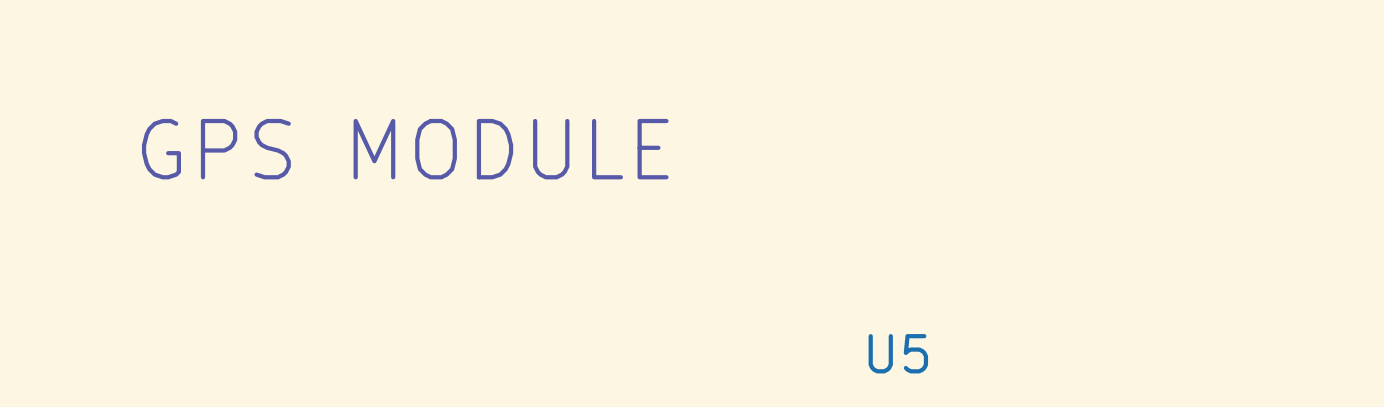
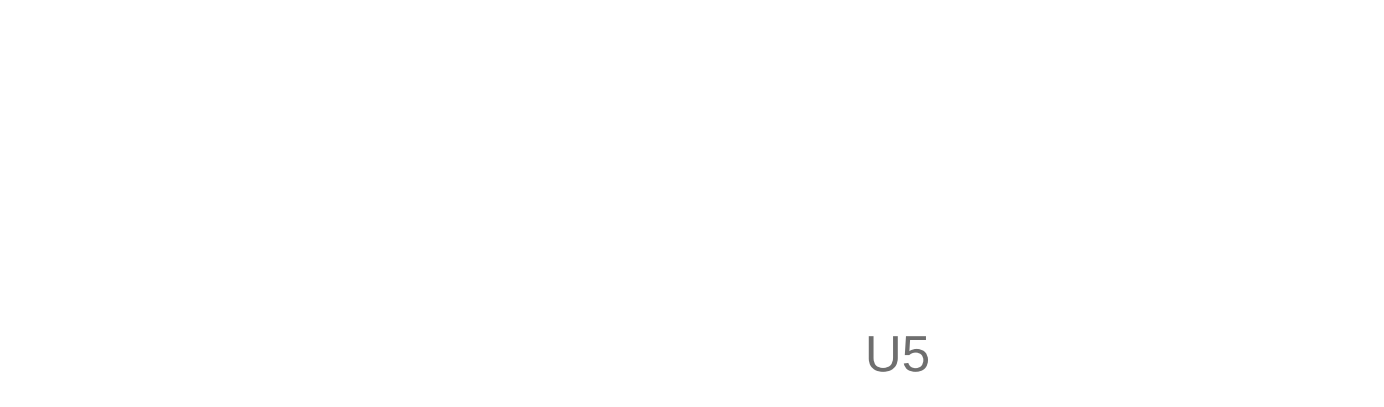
text: GPS MODULE (405, 149) -> none

